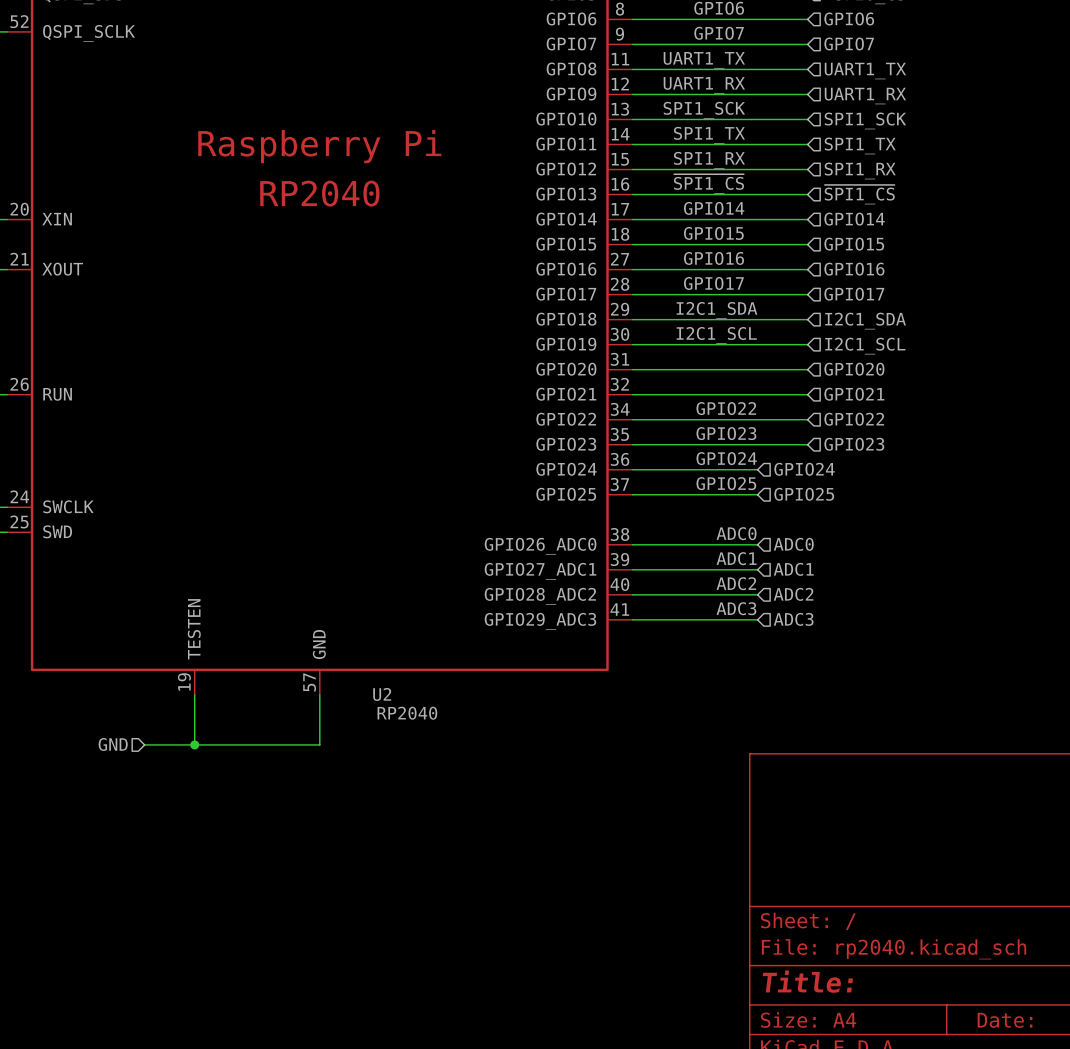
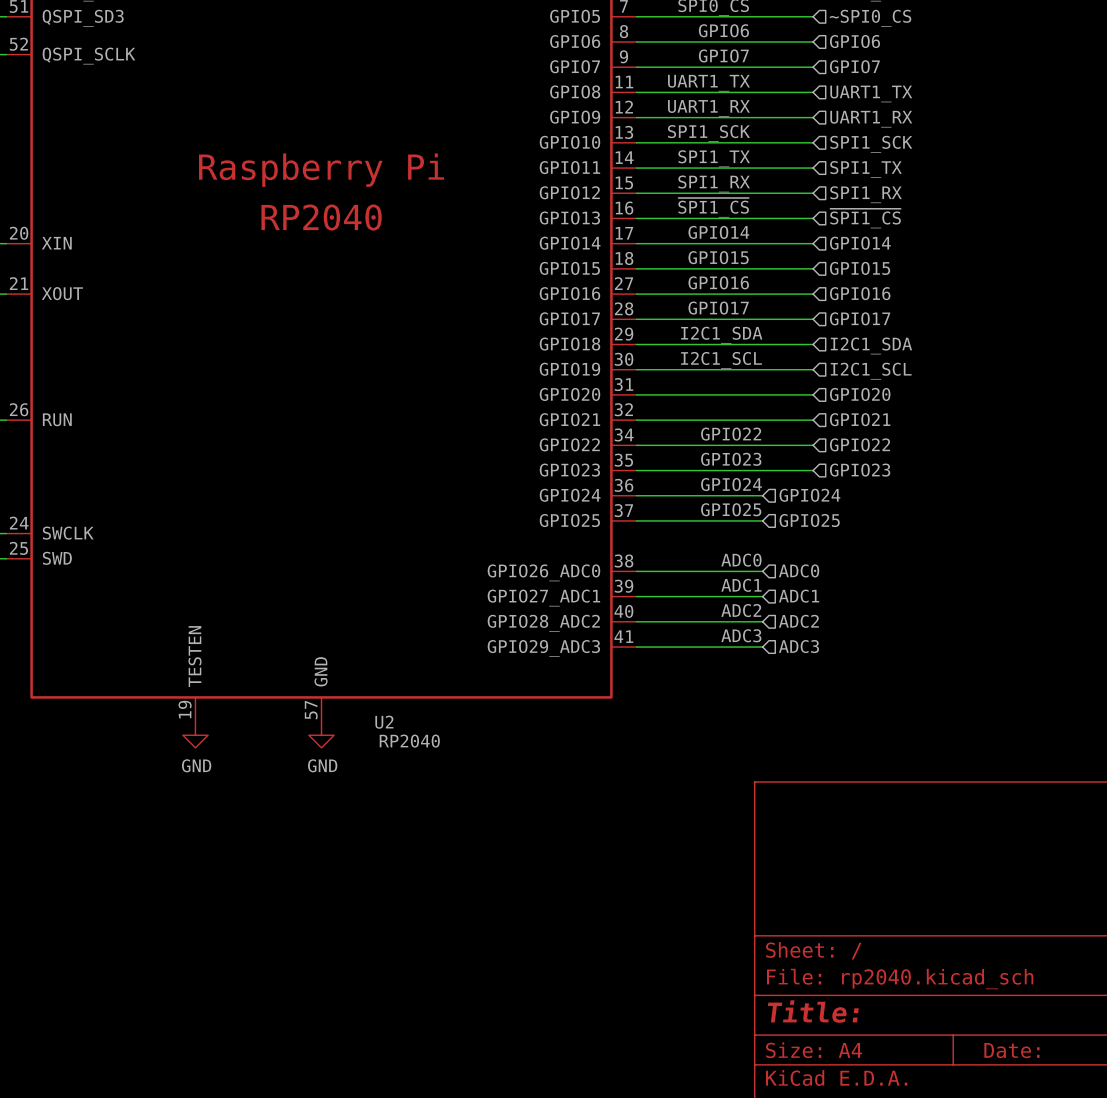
wire: (194, 694) (194, 744) -> none
wire: (319, 694) (319, 744) (144, 744) -> none
power symbol: none -> GND (195, 735)
power symbol: none -> GND (321, 735)
hierarchical label: GND (113, 744) -> none
junction: (194, 744) -> none

